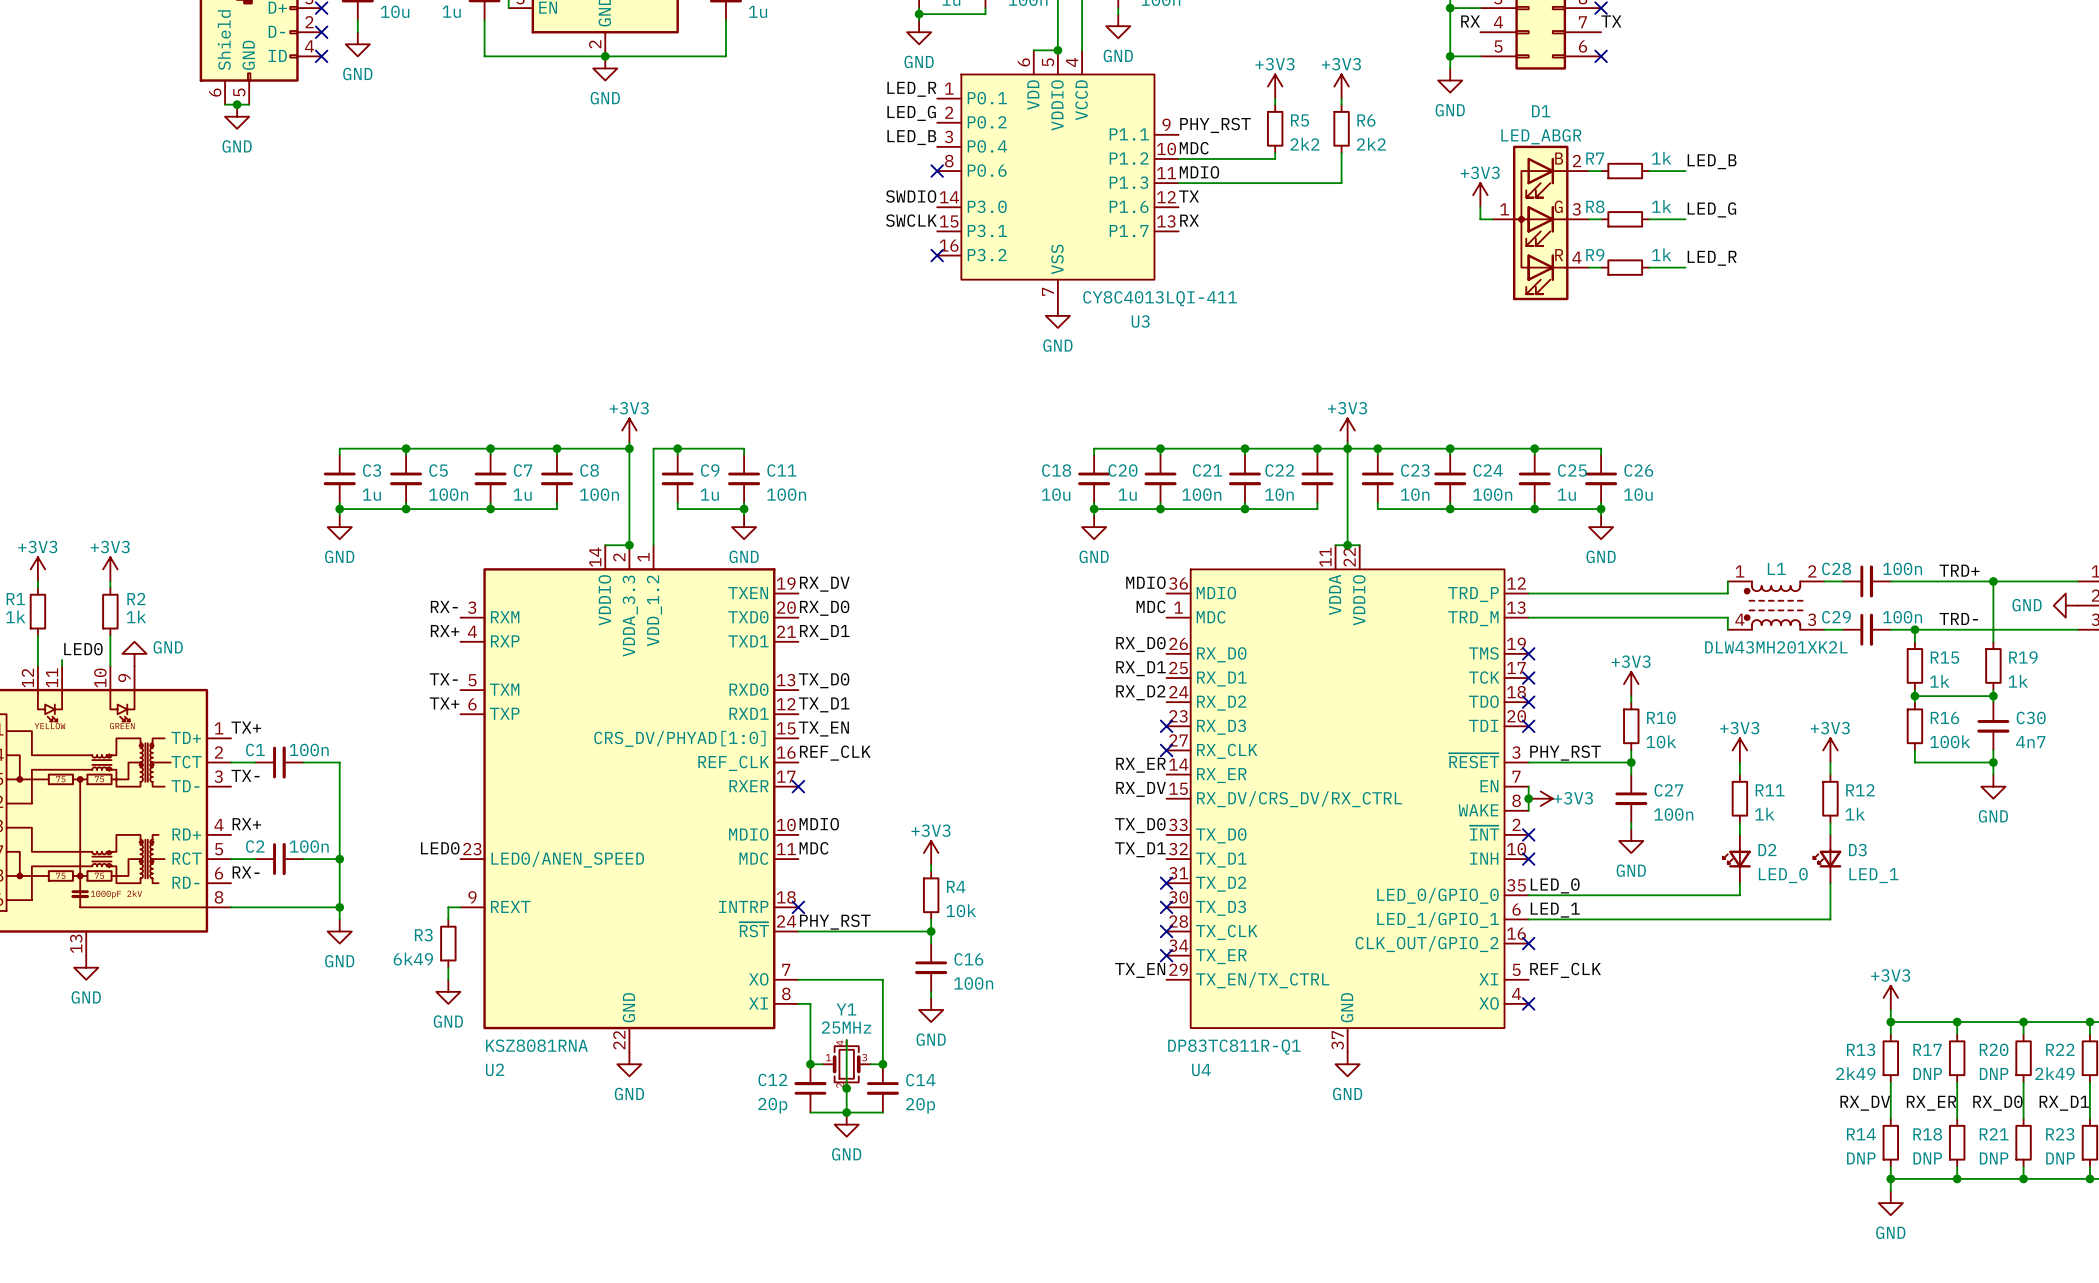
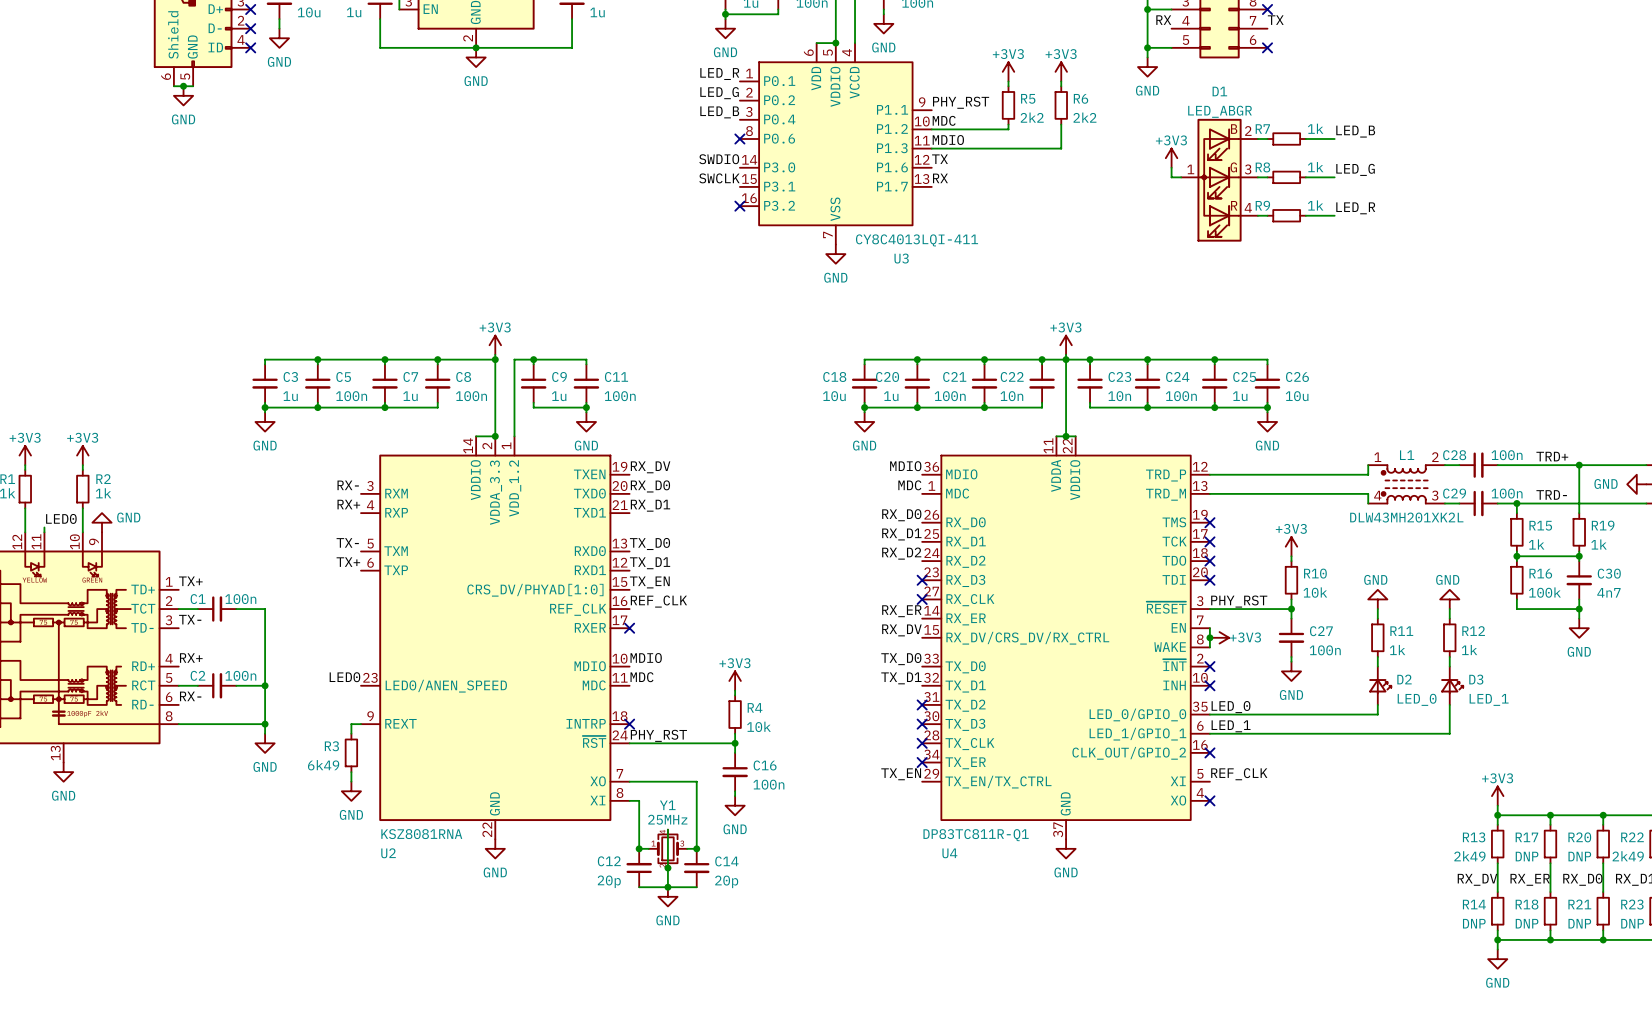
power symbol: +3V3 (1739, 750) -> GND (1377, 599)
power symbol: +3V3 (1830, 750) -> GND (1449, 599)
D2 rotation: 0° (1736, 858) -> 180° (1380, 686)
D3 rotation: 0° (1827, 858) -> 180° (1452, 686)

